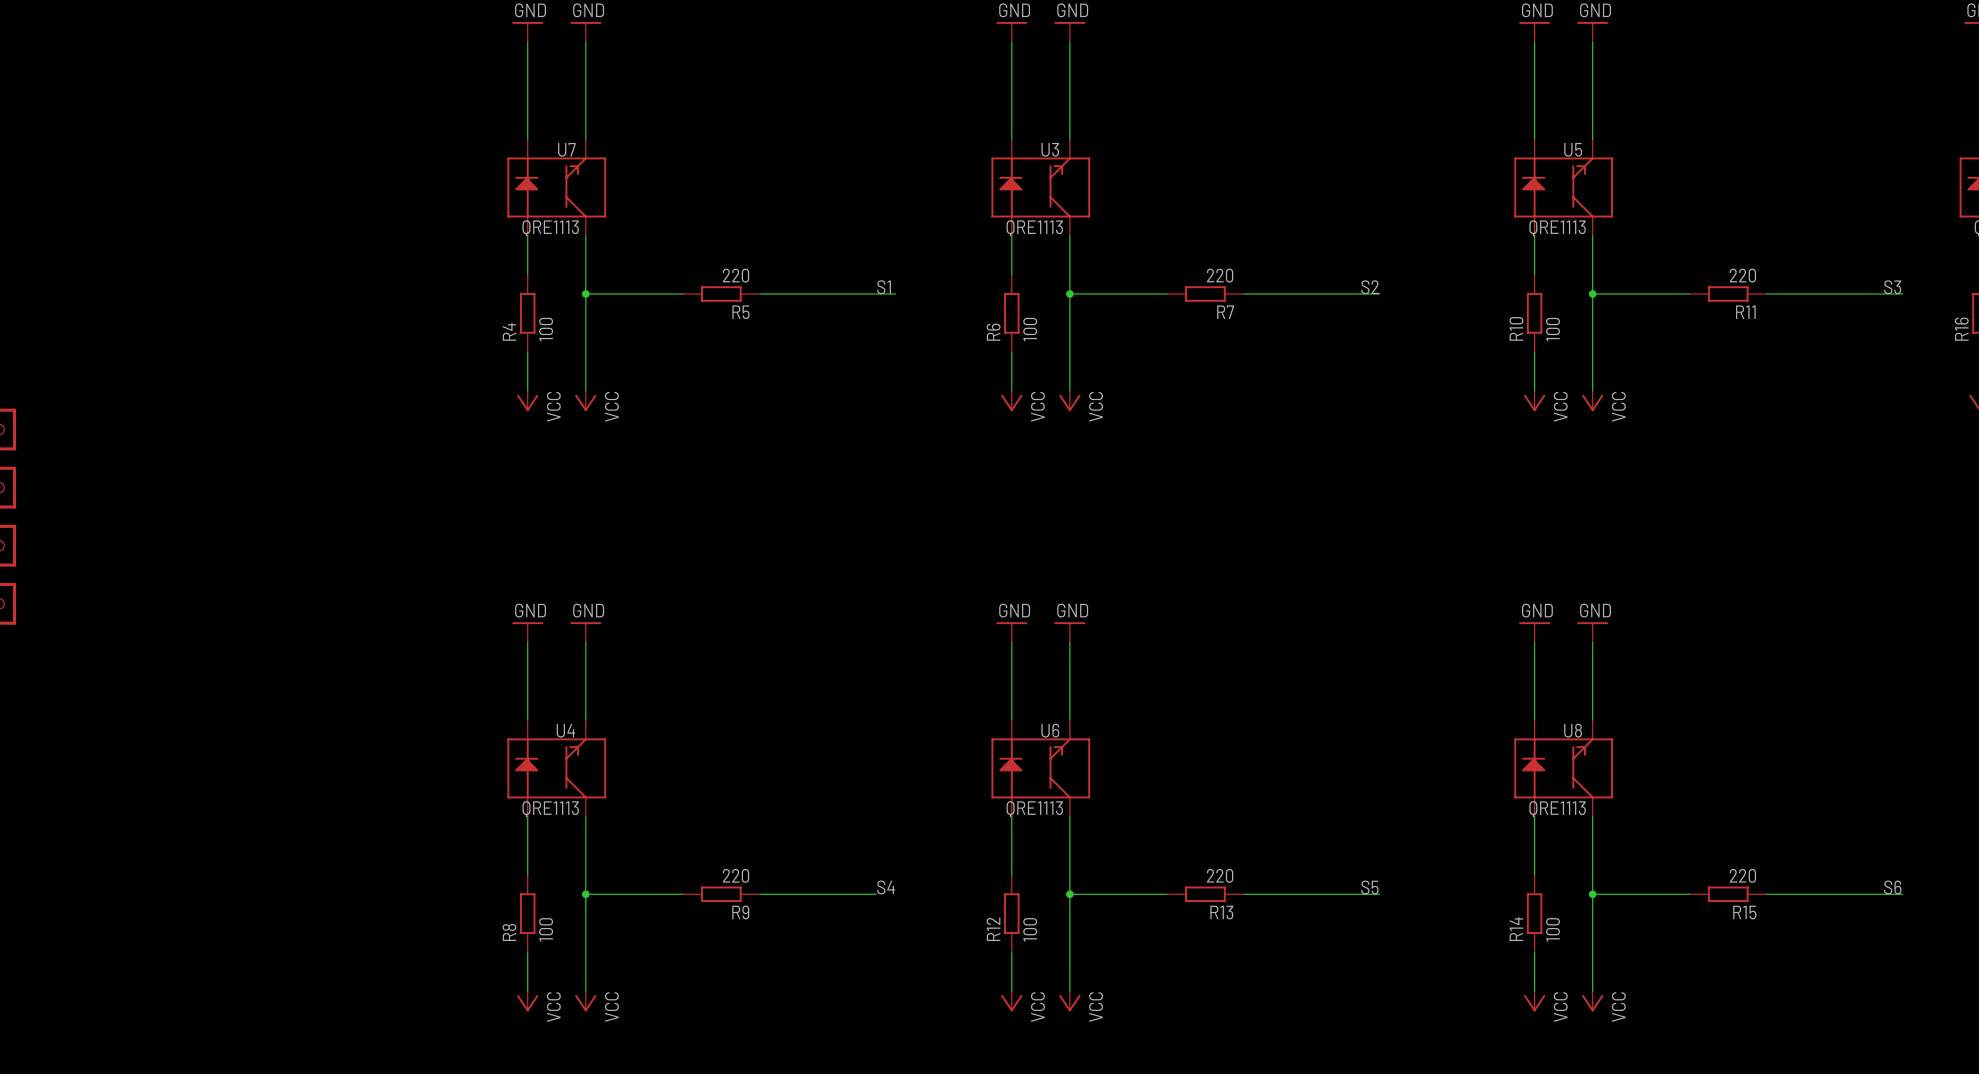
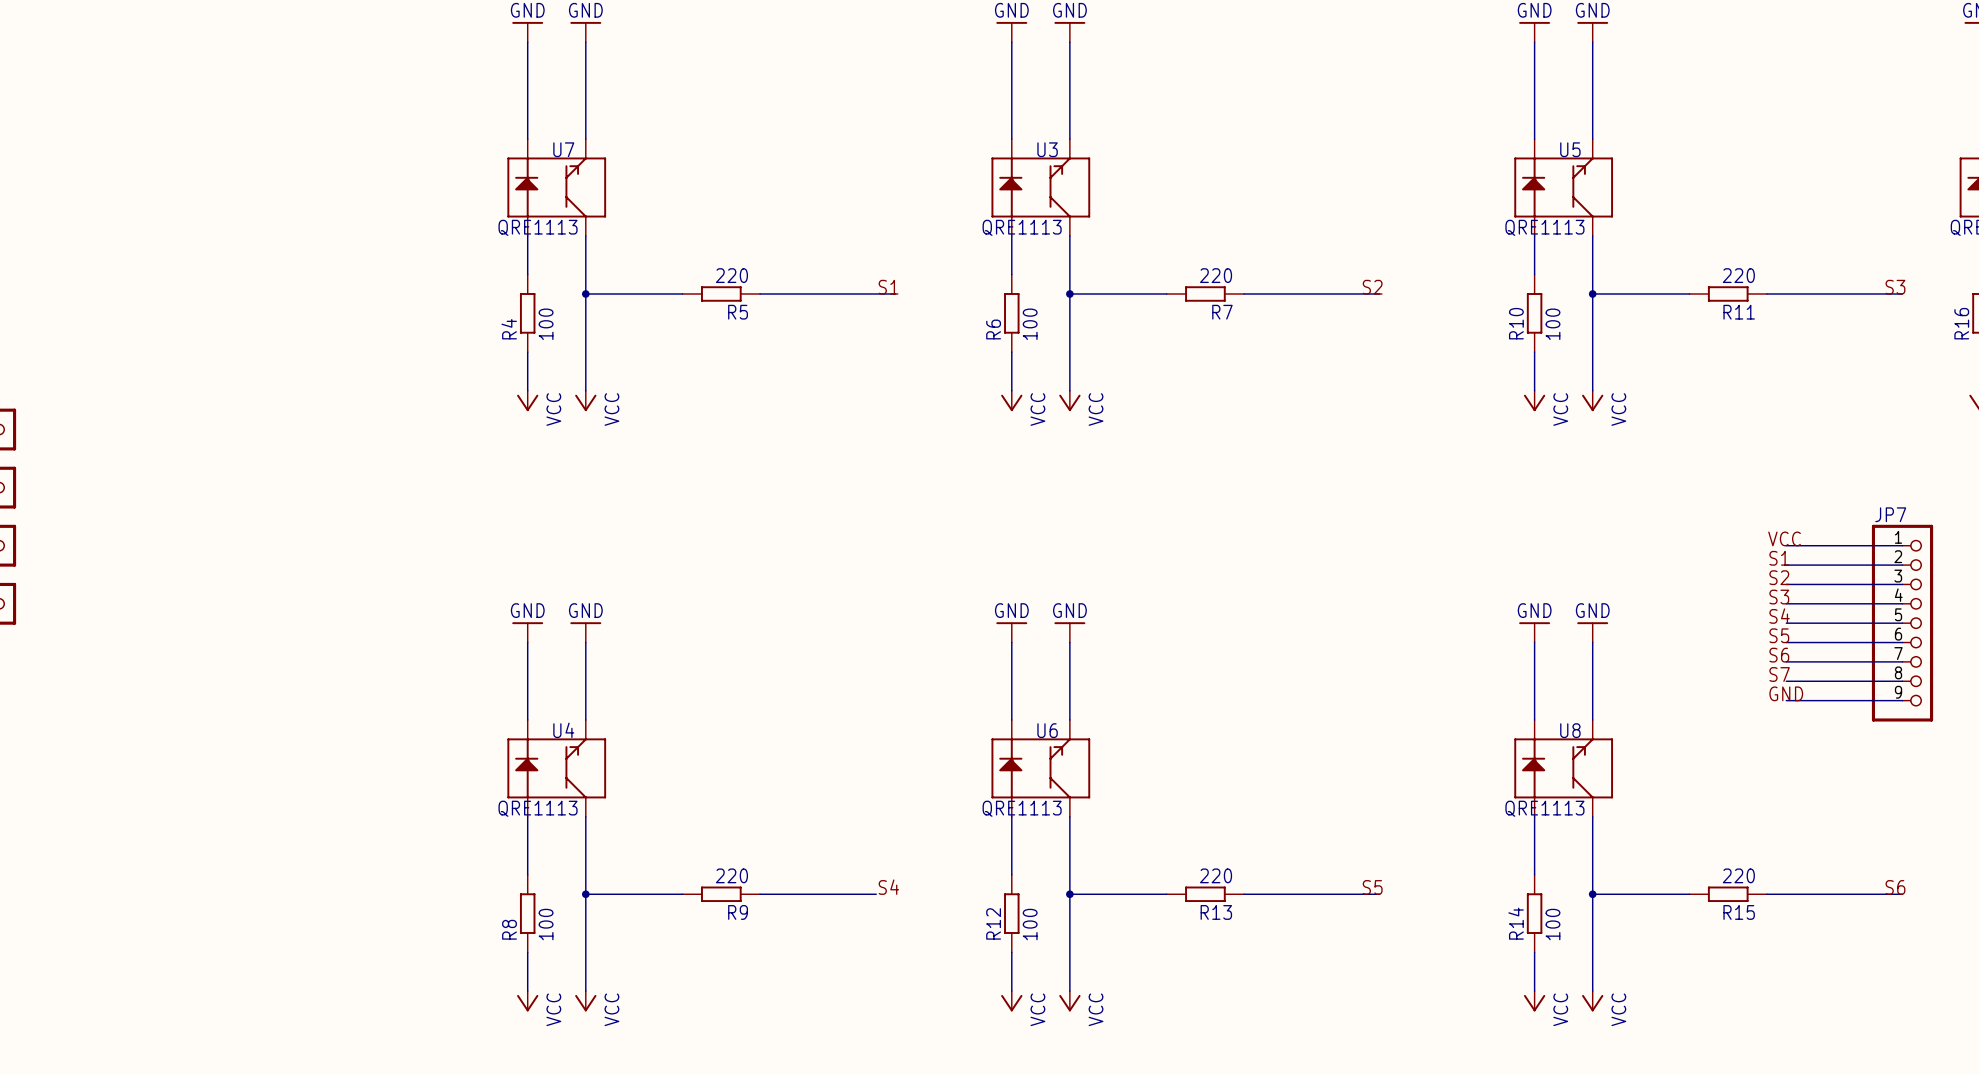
label: none -> VCC (1784, 538)
wire: none -> (1786, 545) (1902, 545)
label: none -> S1 (1779, 558)
wire: none -> (1786, 565) (1902, 565)
label: none -> S2 (1779, 577)
wire: none -> (1786, 584) (1902, 584)
label: none -> S3 (1779, 597)
wire: none -> (1786, 603) (1902, 603)
label: none -> S4 (1779, 616)
wire: none -> (1786, 623) (1902, 623)
JP7: none -> (1902, 623)
label: none -> S5 (1779, 635)
wire: none -> (1786, 642) (1902, 642)
label: none -> S6 (1779, 655)
wire: none -> (1786, 661) (1902, 661)
label: none -> S7 (1779, 674)
wire: none -> (1786, 681) (1902, 681)
label: none -> GND (1786, 693)
wire: none -> (1786, 700) (1902, 700)

